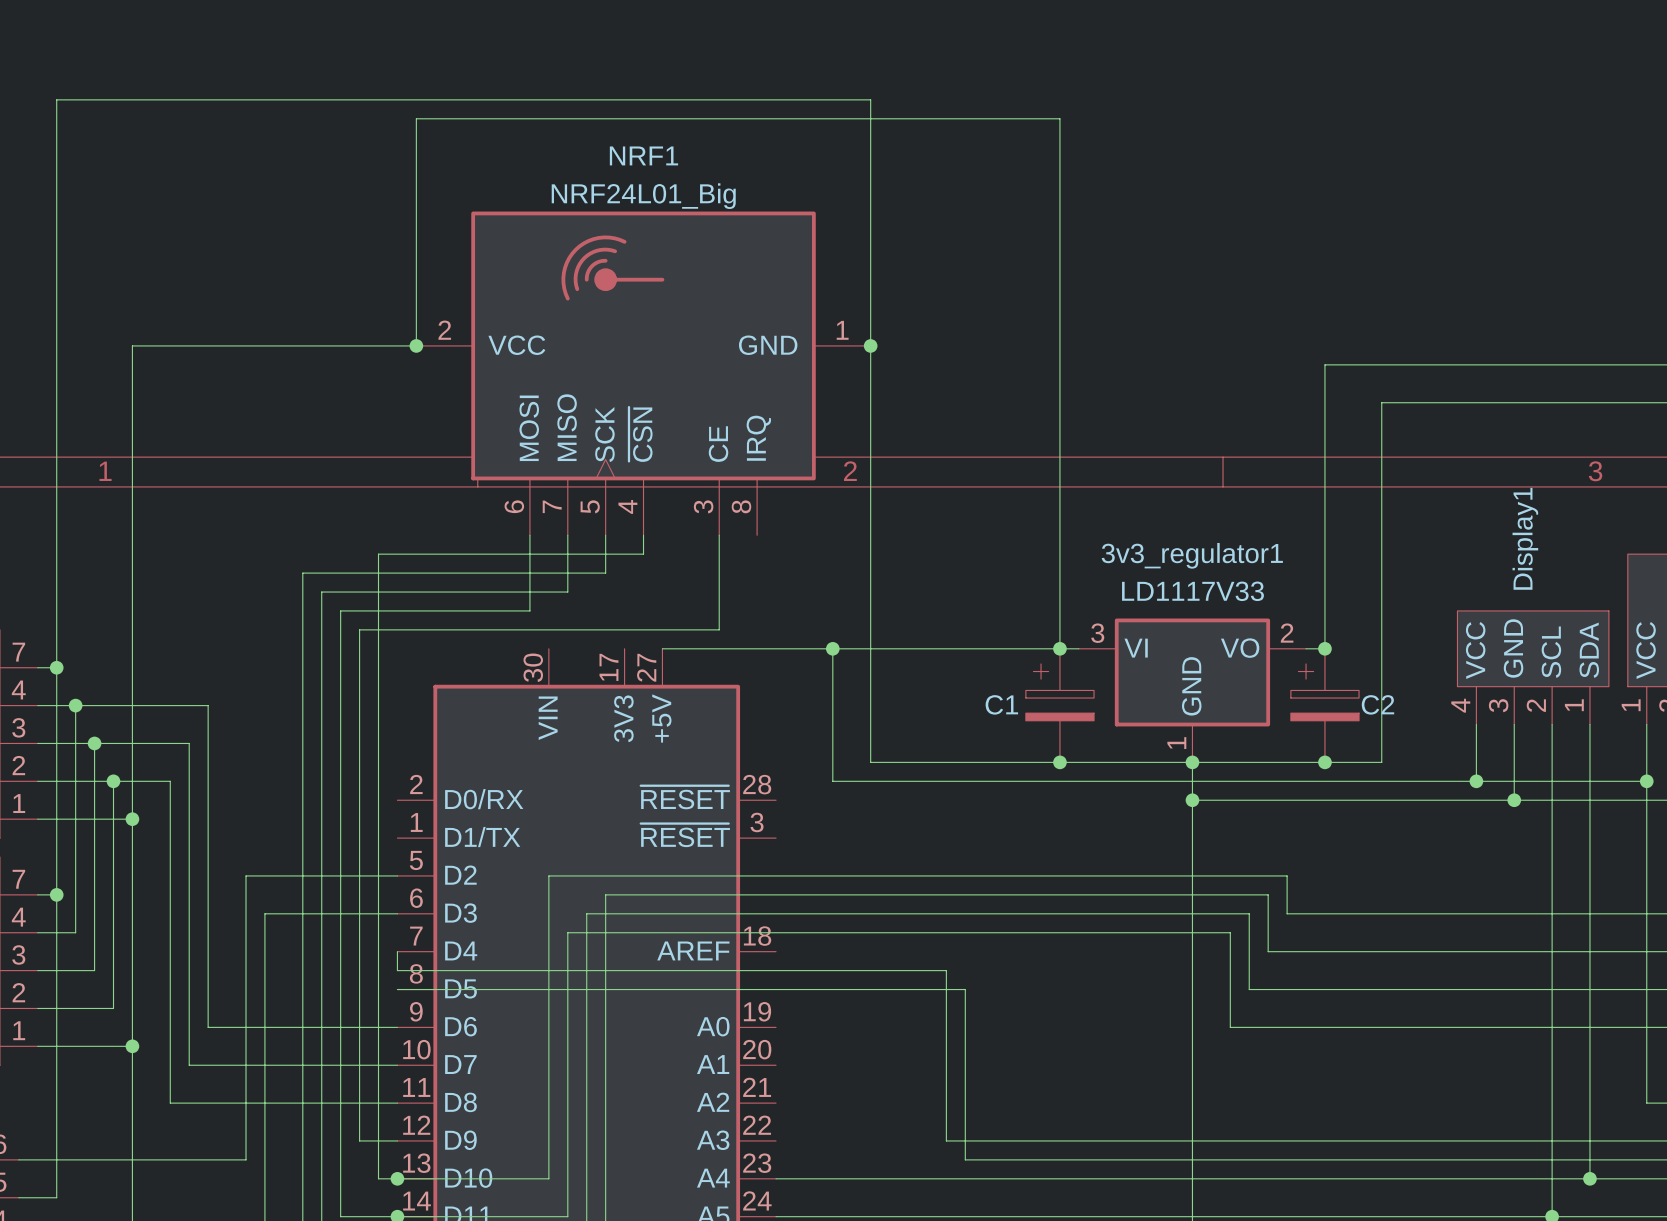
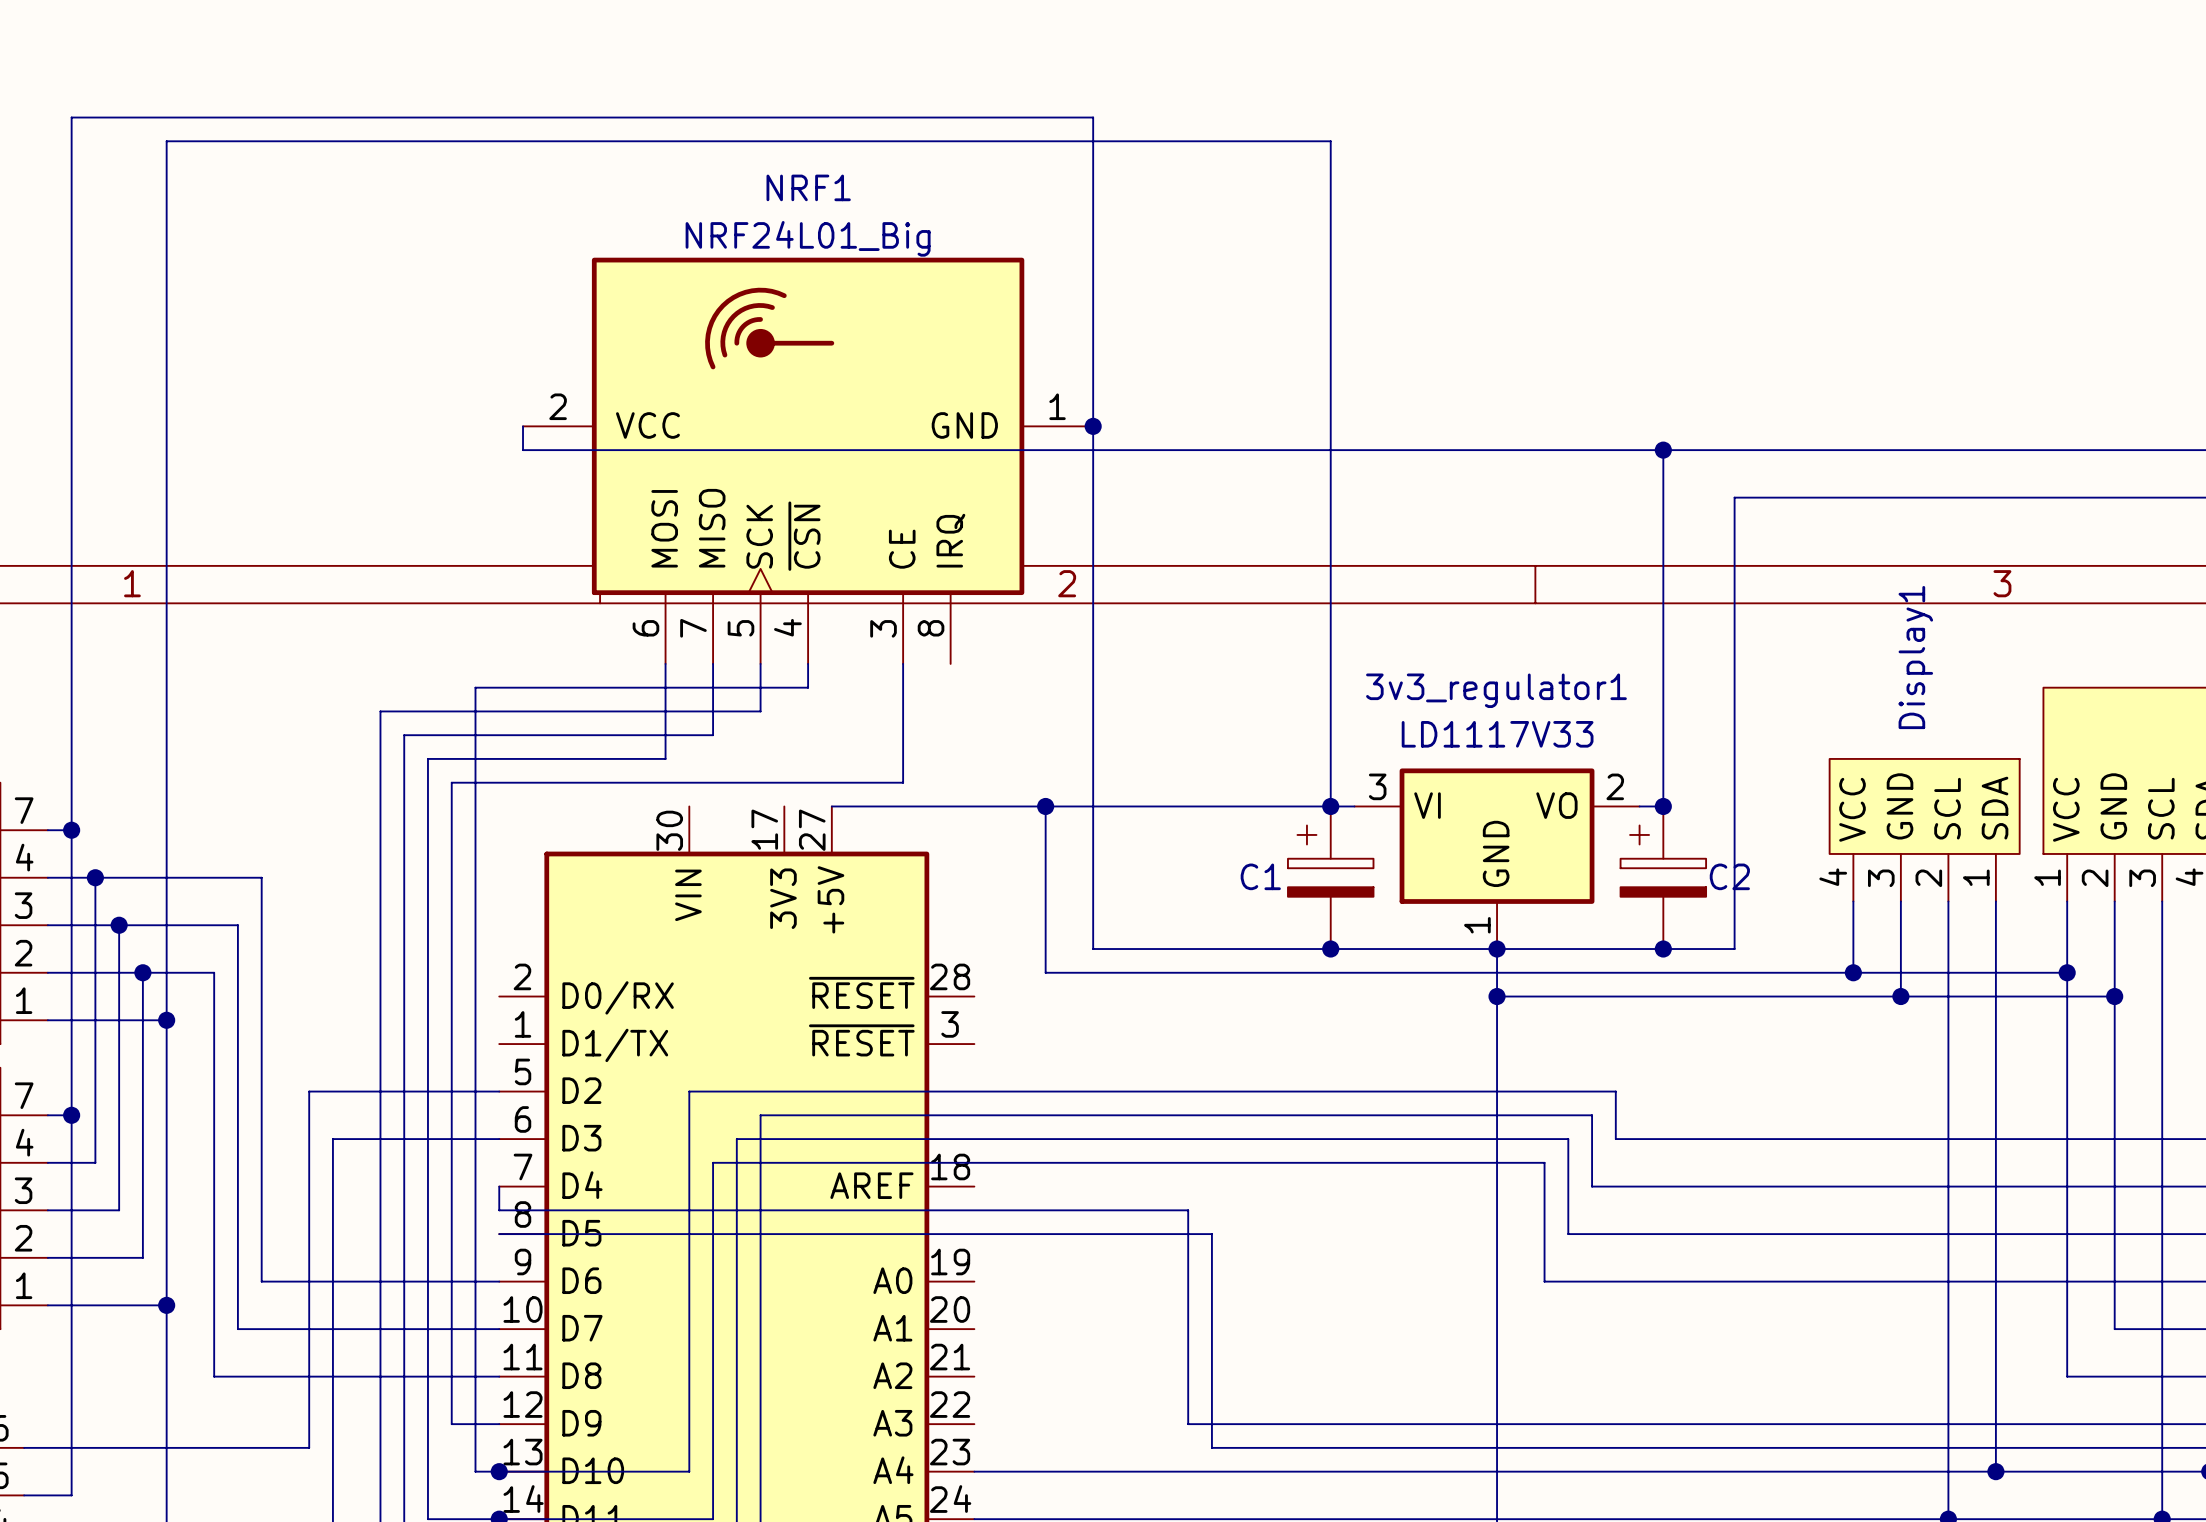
wire: (416, 118) (416, 345) (132, 345) -> (523, 141) (166, 141) (166, 426)
wire: none -> (523, 426) (523, 450) (1663, 450)
junction: (416, 345) -> none
junction: none -> (1663, 450)

